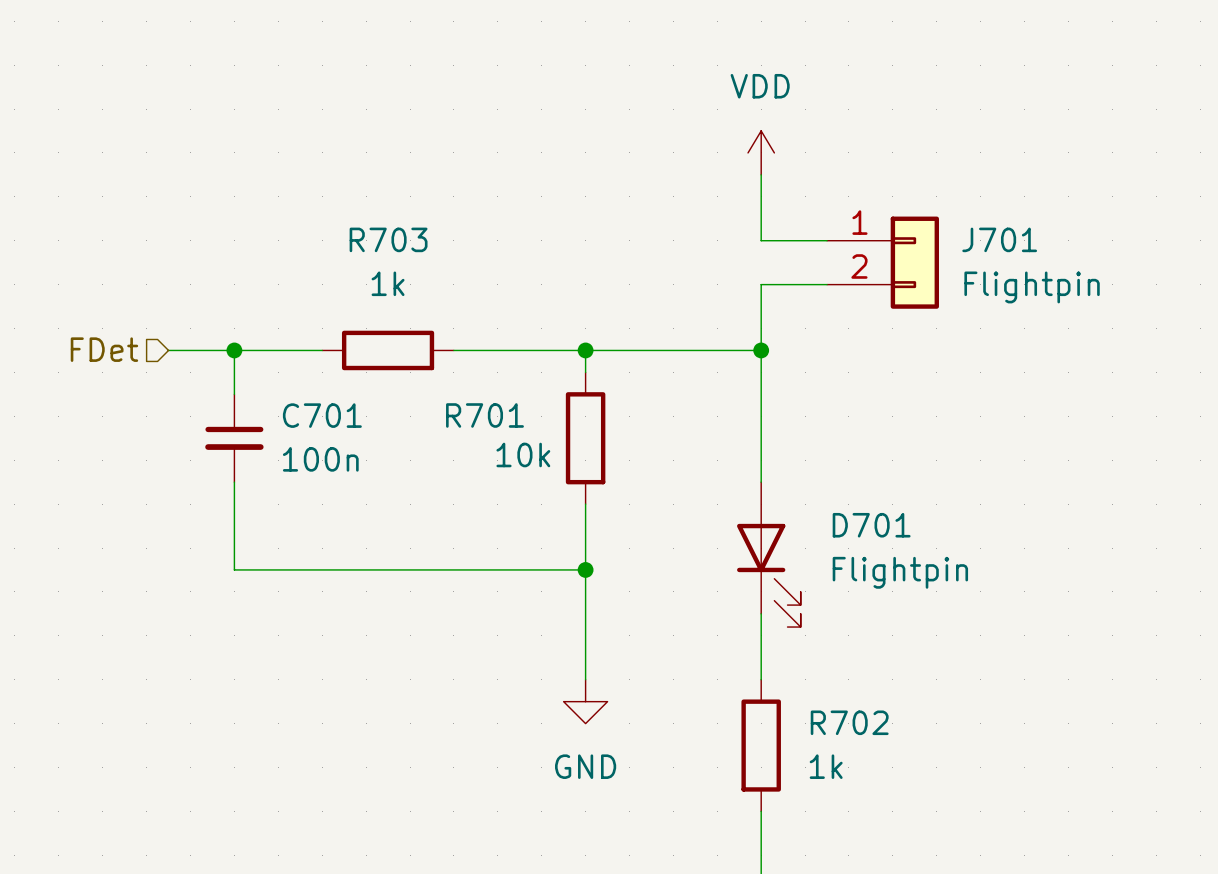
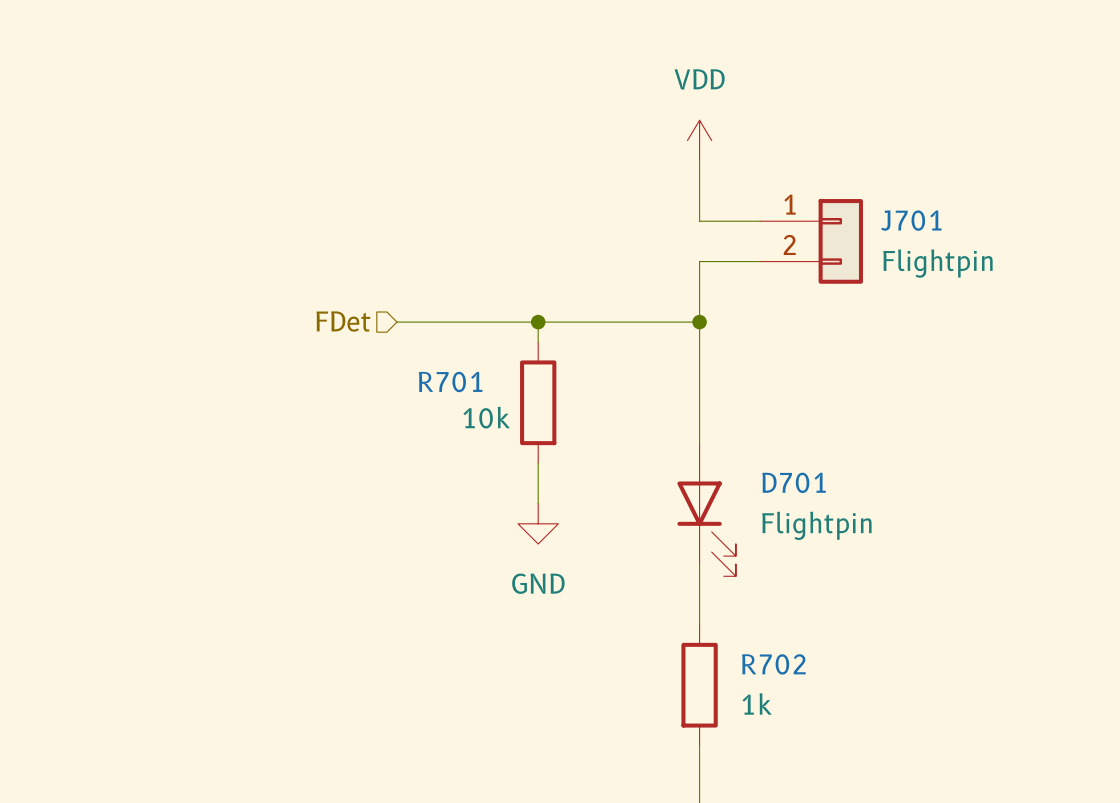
hierarchical label position: FDet (104, 349) -> FDet (343, 321)
wire: (168, 350) (322, 350) -> none
wire: (234, 350) (234, 394) -> none
junction: (234, 350) -> none
R703: 1k (388, 350) -> none
C701: 100n (234, 438) -> none
wire: (234, 482) (234, 569) (585, 569) -> none
wire: (585, 548) (585, 679) -> none
junction: (585, 569) -> none
power symbol position: GND (585, 701) -> GND (538, 523)

